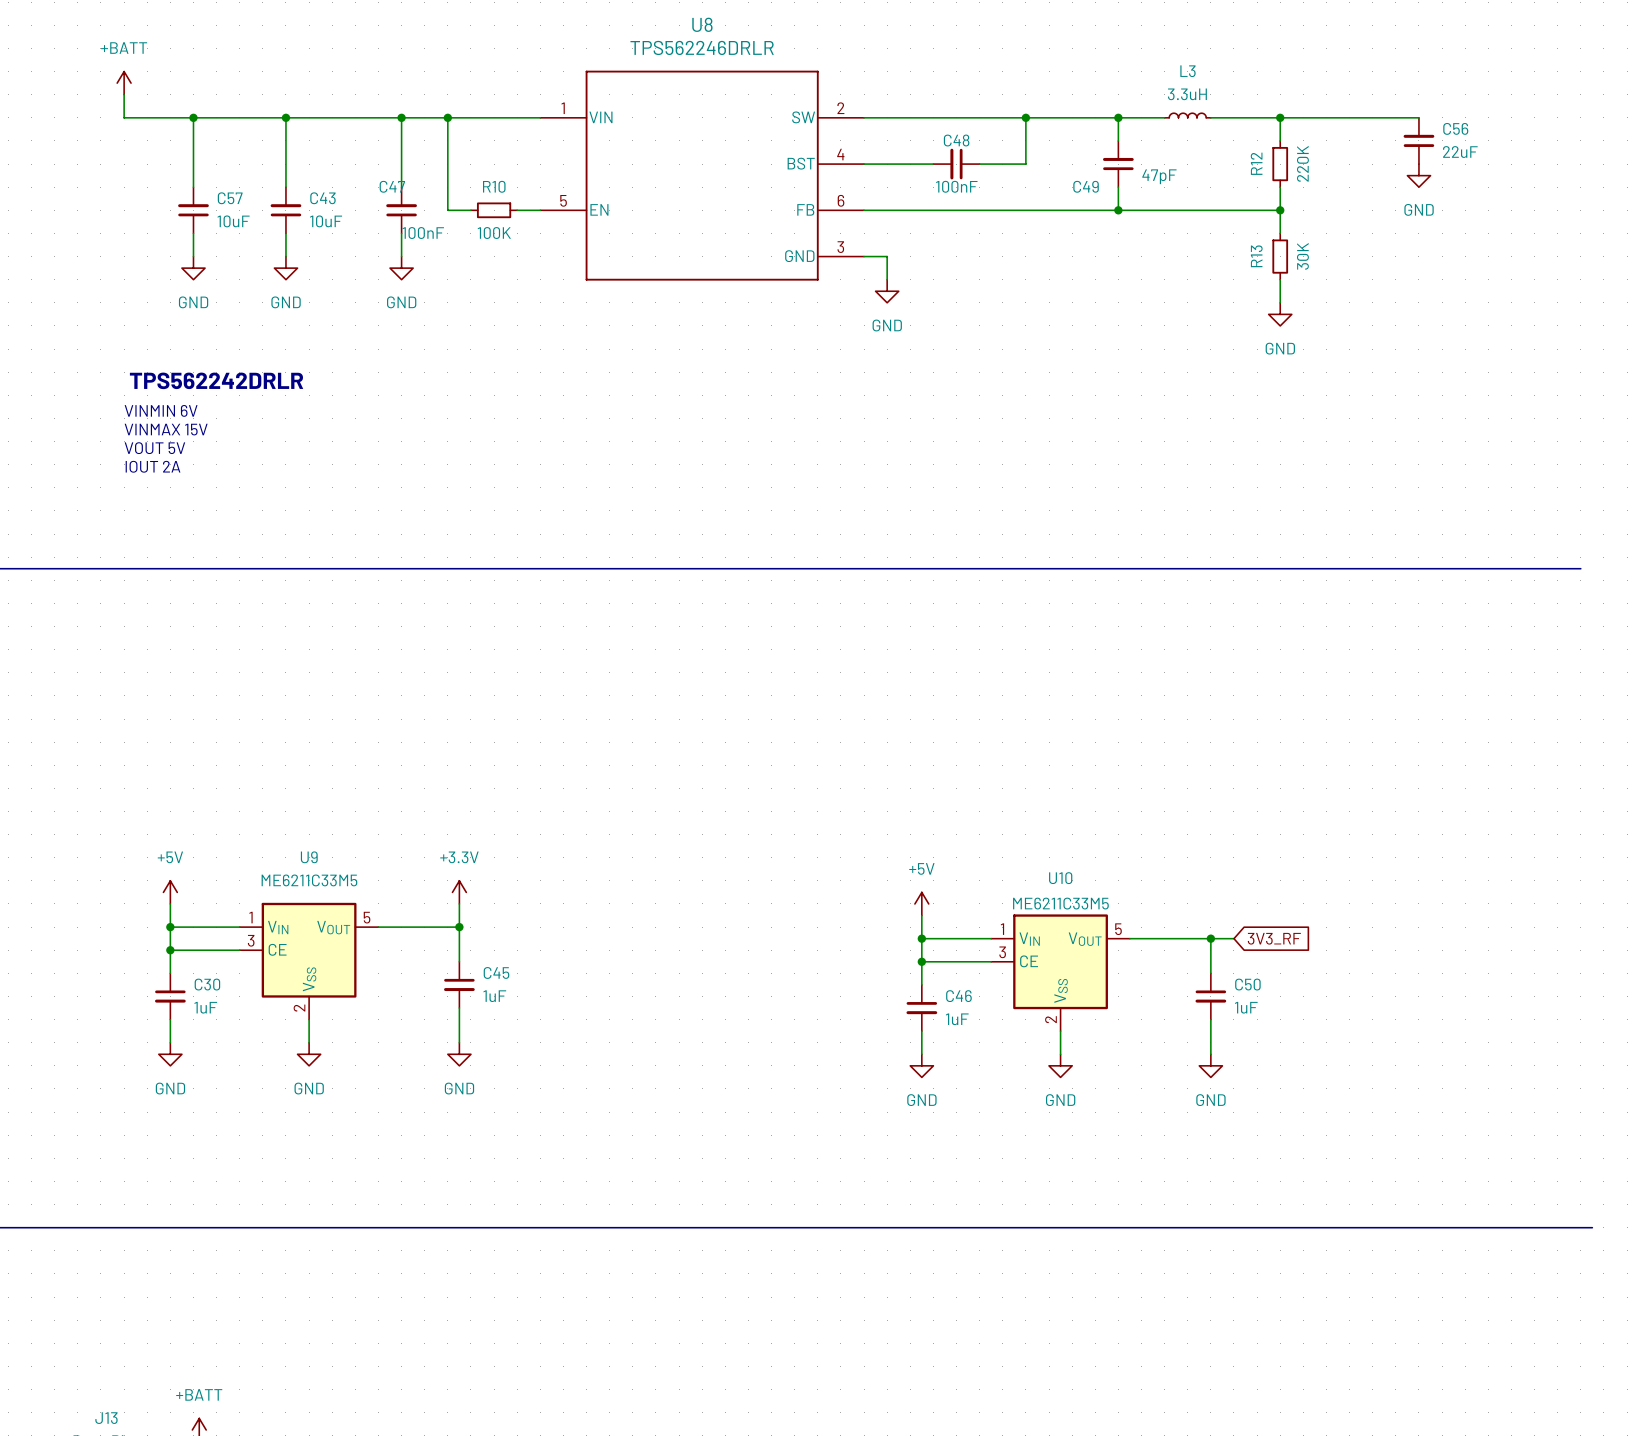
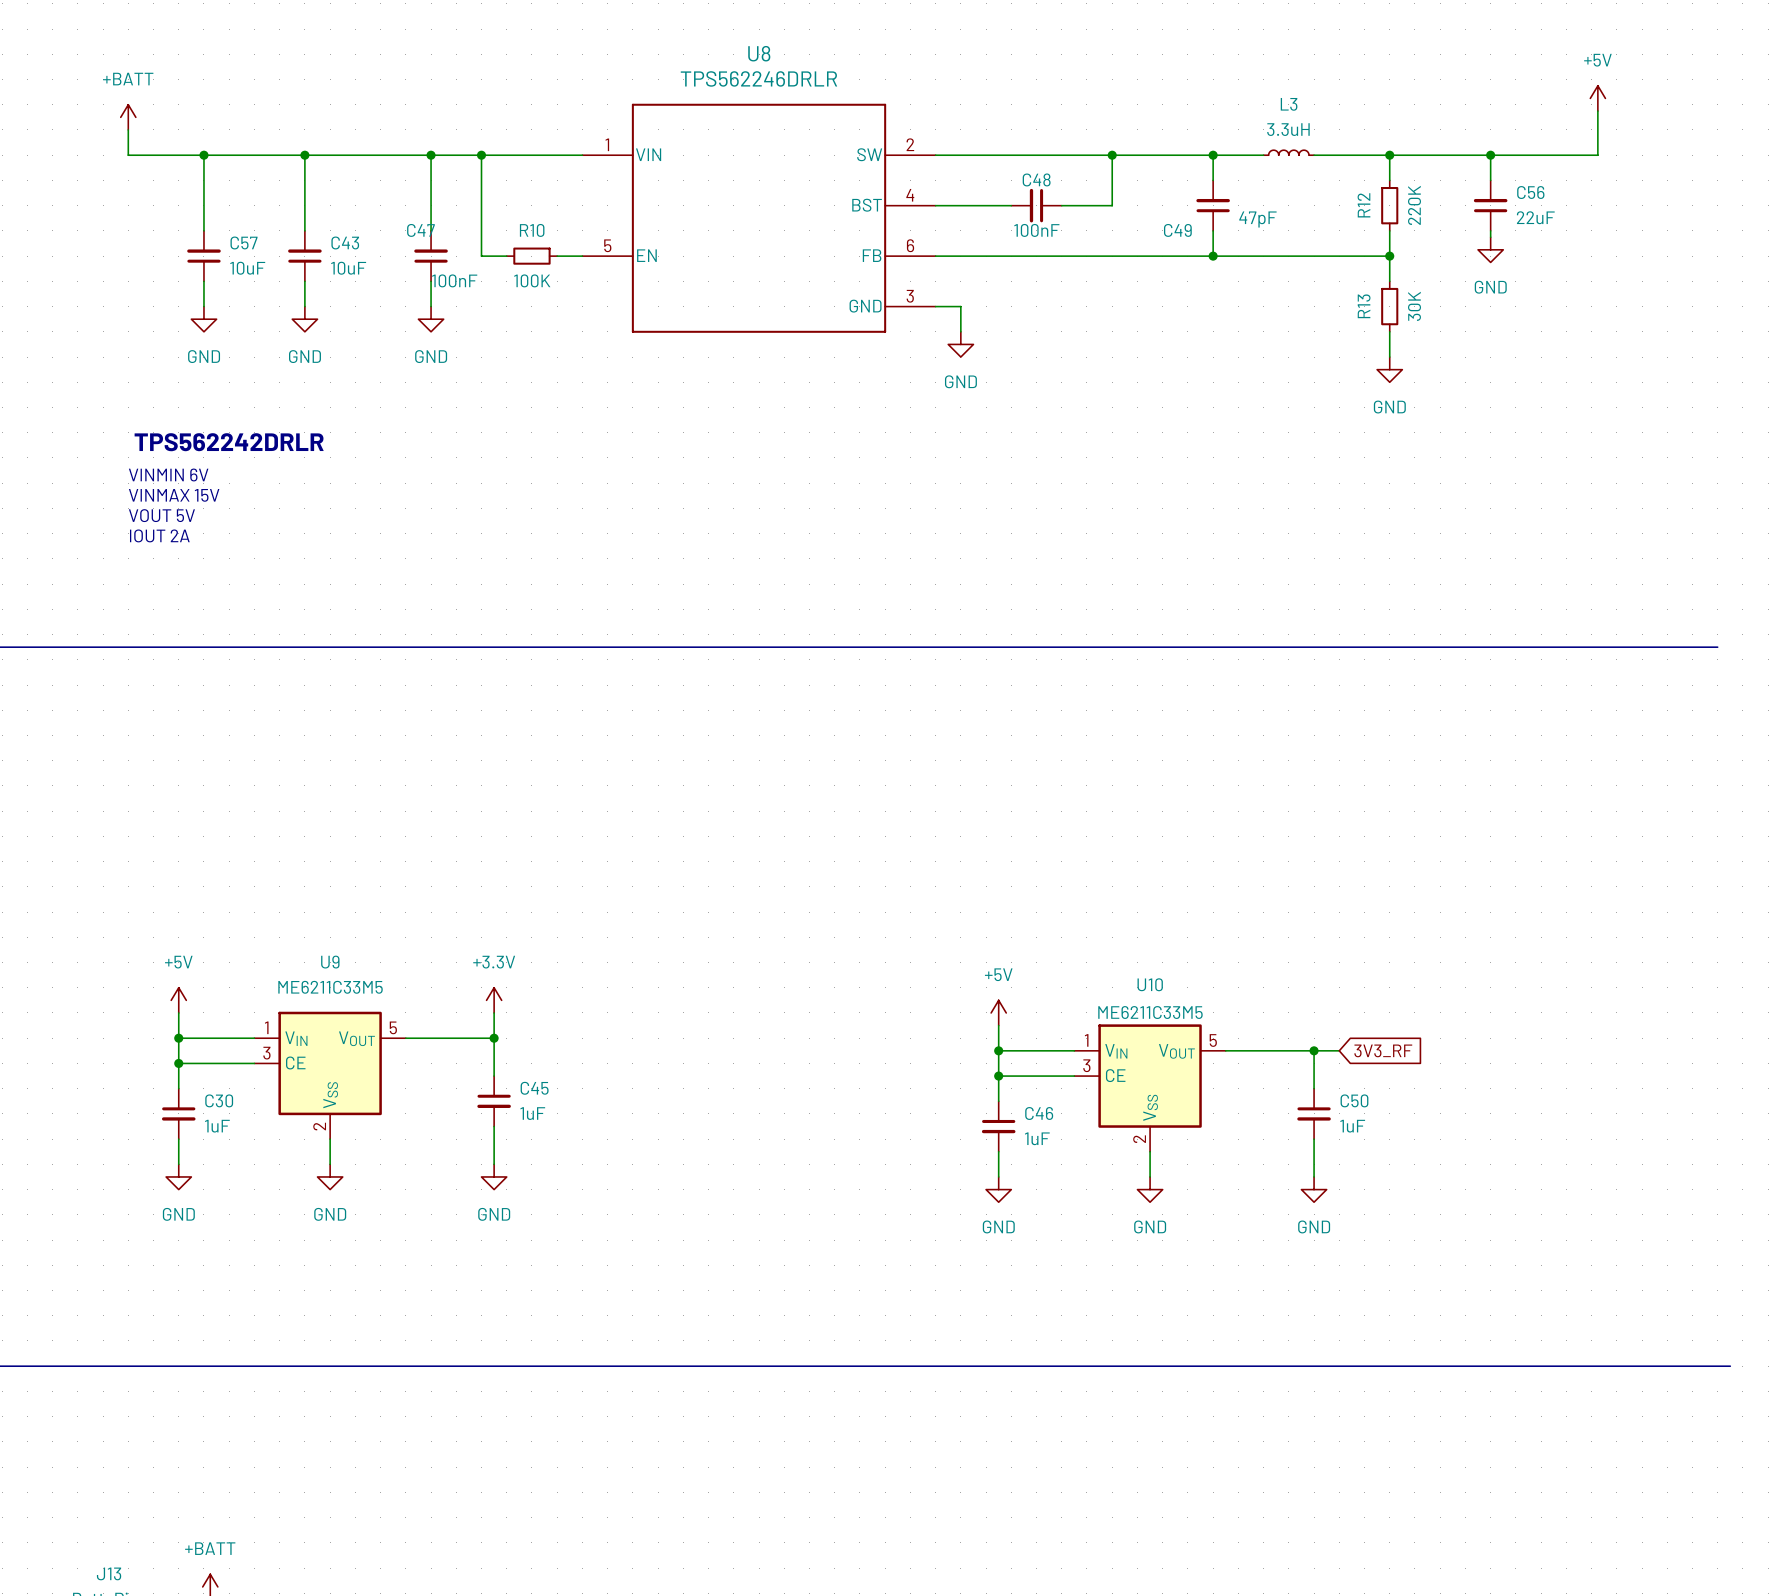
power symbol: none -> +5V (1597, 98)
wire: none -> (1597, 111) (1597, 155) (1541, 155)
wire: none -> (1490, 155) (1490, 180)
junction: none -> (1490, 155)
C56 position: (1418, 140) -> (1490, 205)
power symbol position: GND (1418, 175) -> GND (1490, 249)
wire: none -> (1490, 230) (1490, 237)

